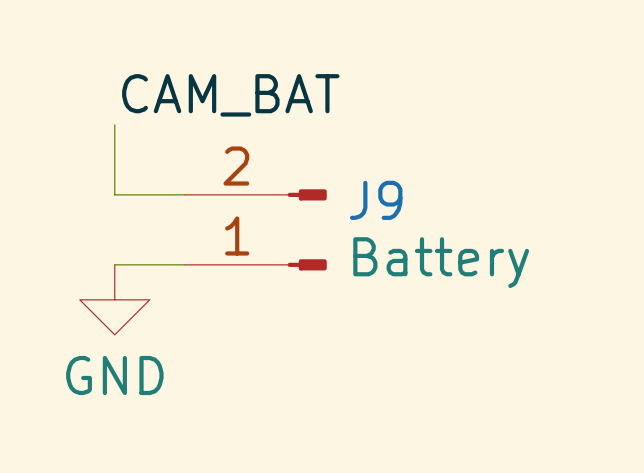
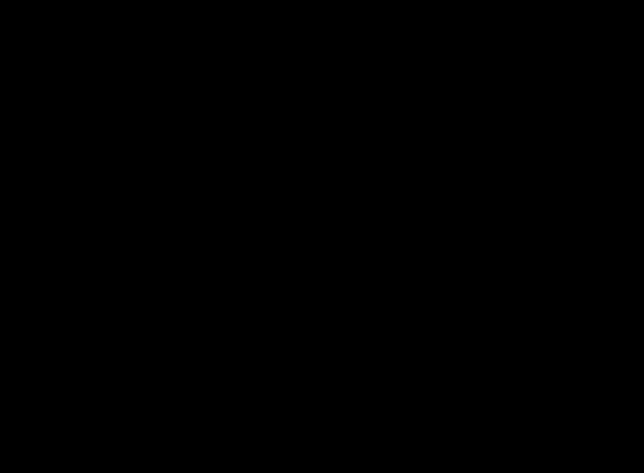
label: CAM_BAT (230, 95) -> none
wire: (114, 124) (114, 194) (184, 194) -> none
J9: Battery (255, 229) -> none
wire: (114, 264) (184, 264) -> none
power symbol: GND (114, 299) -> none

